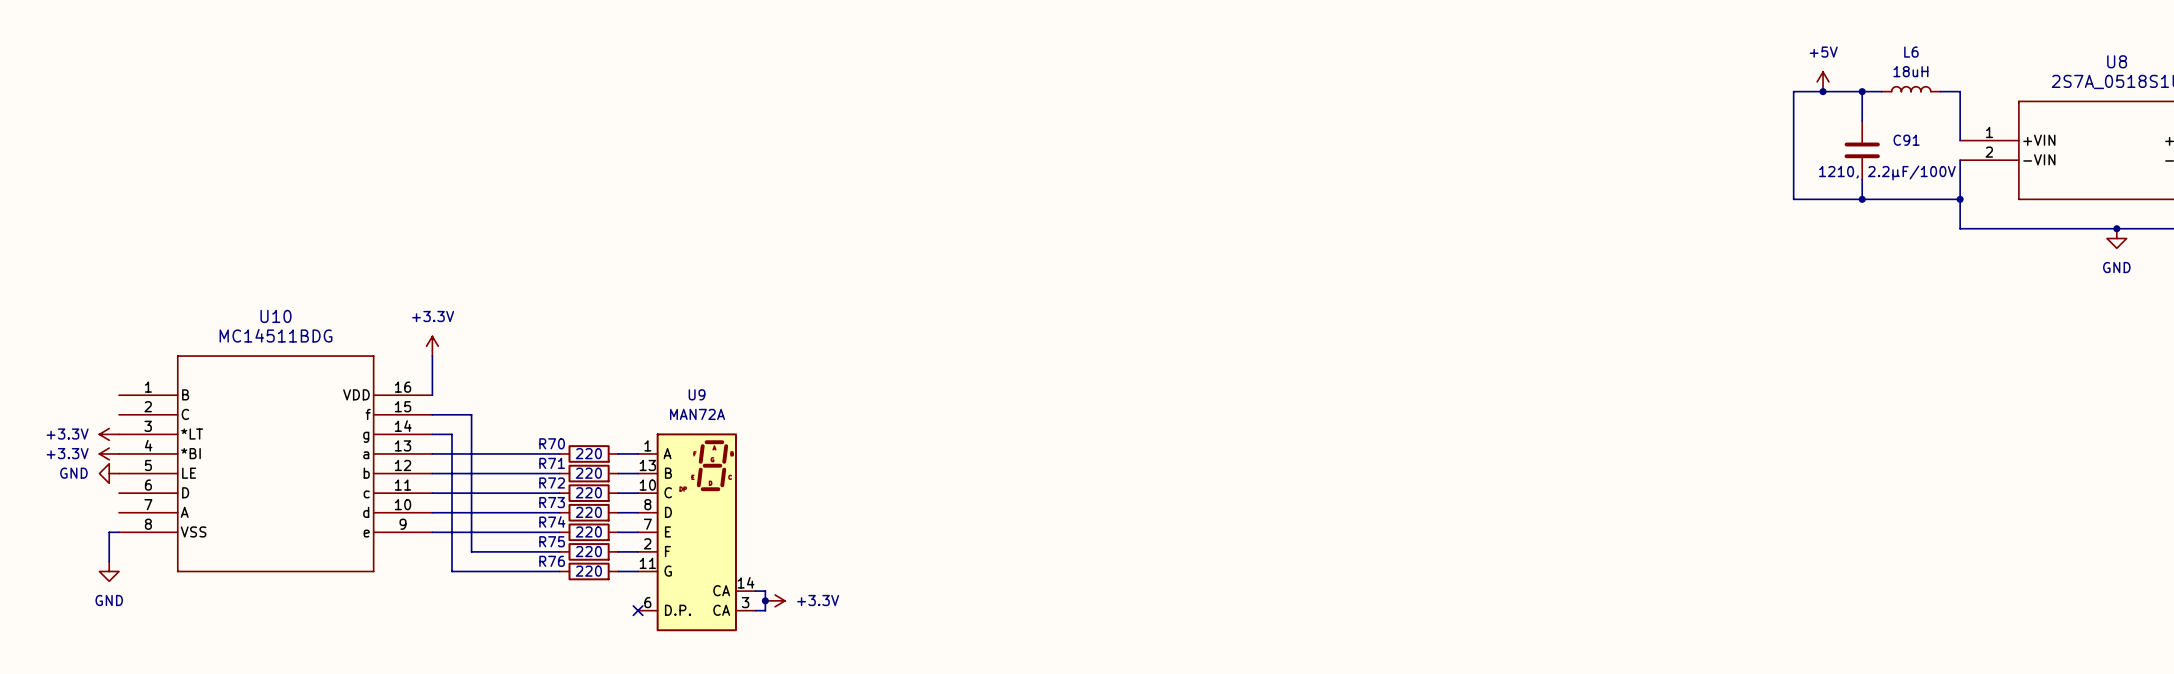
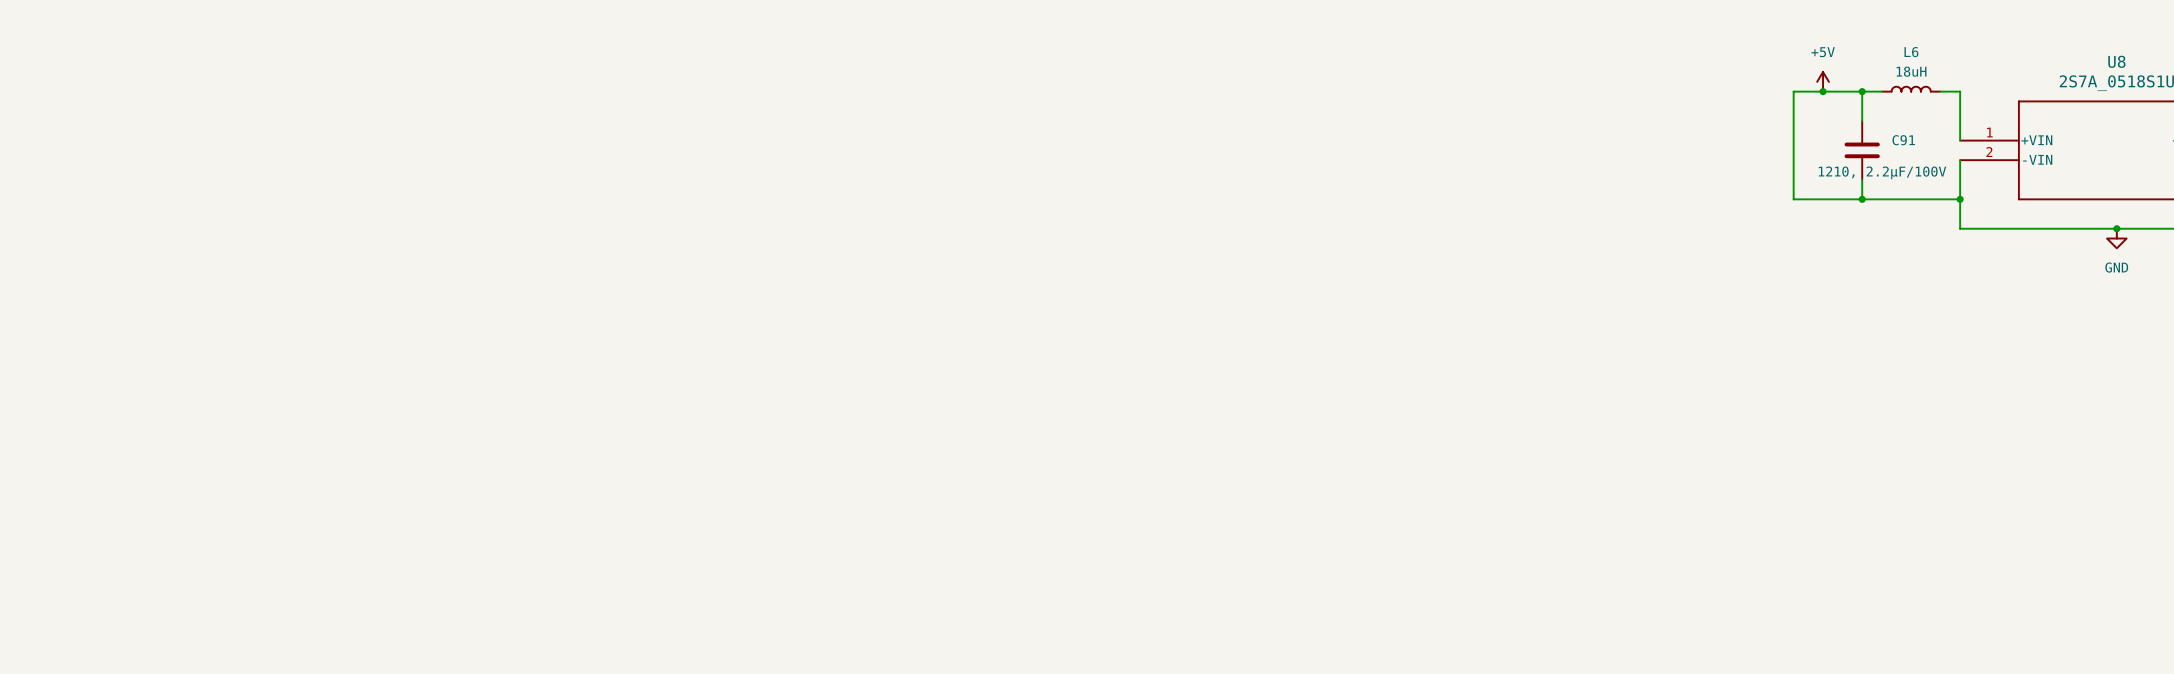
power symbol: +3.3V (432, 346) -> none
wire: (432, 356) (432, 395) -> none
wire: (432, 414) (471, 414) (471, 551) (559, 551) -> none
power symbol: +3.3V (109, 434) -> none
wire: (432, 434) (451, 434) (451, 571) (559, 571) -> none
power symbol: +3.3V (109, 453) -> none
wire: (432, 453) (559, 453) -> none
R70: 220 (589, 453) -> none
wire: (618, 453) (638, 453) -> none
U10: MC14511BDG (275, 463) -> none
power symbol: GND (109, 473) -> none
wire: (432, 473) (559, 473) -> none
R71: 220 (589, 473) -> none
wire: (618, 473) (638, 473) -> none
wire: (432, 493) (559, 493) -> none
R72: 220 (589, 493) -> none
wire: (618, 493) (638, 493) -> none
wire: (432, 512) (559, 512) -> none
R73: 220 (589, 512) -> none
wire: (618, 512) (638, 512) -> none
wire: (119, 532) (109, 532) (109, 561) -> none
wire: (432, 532) (559, 532) -> none
R74: 220 (589, 532) -> none
wire: (618, 532) (638, 532) -> none
U9: MAN72A (696, 532) -> none
R75: 220 (589, 551) -> none
wire: (618, 551) (638, 551) -> none
power symbol: GND (109, 571) -> none
R76: 220 (589, 571) -> none
wire: (618, 571) (638, 571) -> none
wire: (755, 591) (765, 591) (765, 610) (755, 610) -> none
junction: (765, 600) -> none
power symbol: +3.3V (775, 600) -> none
no-connect mark: (638, 610) -> none

